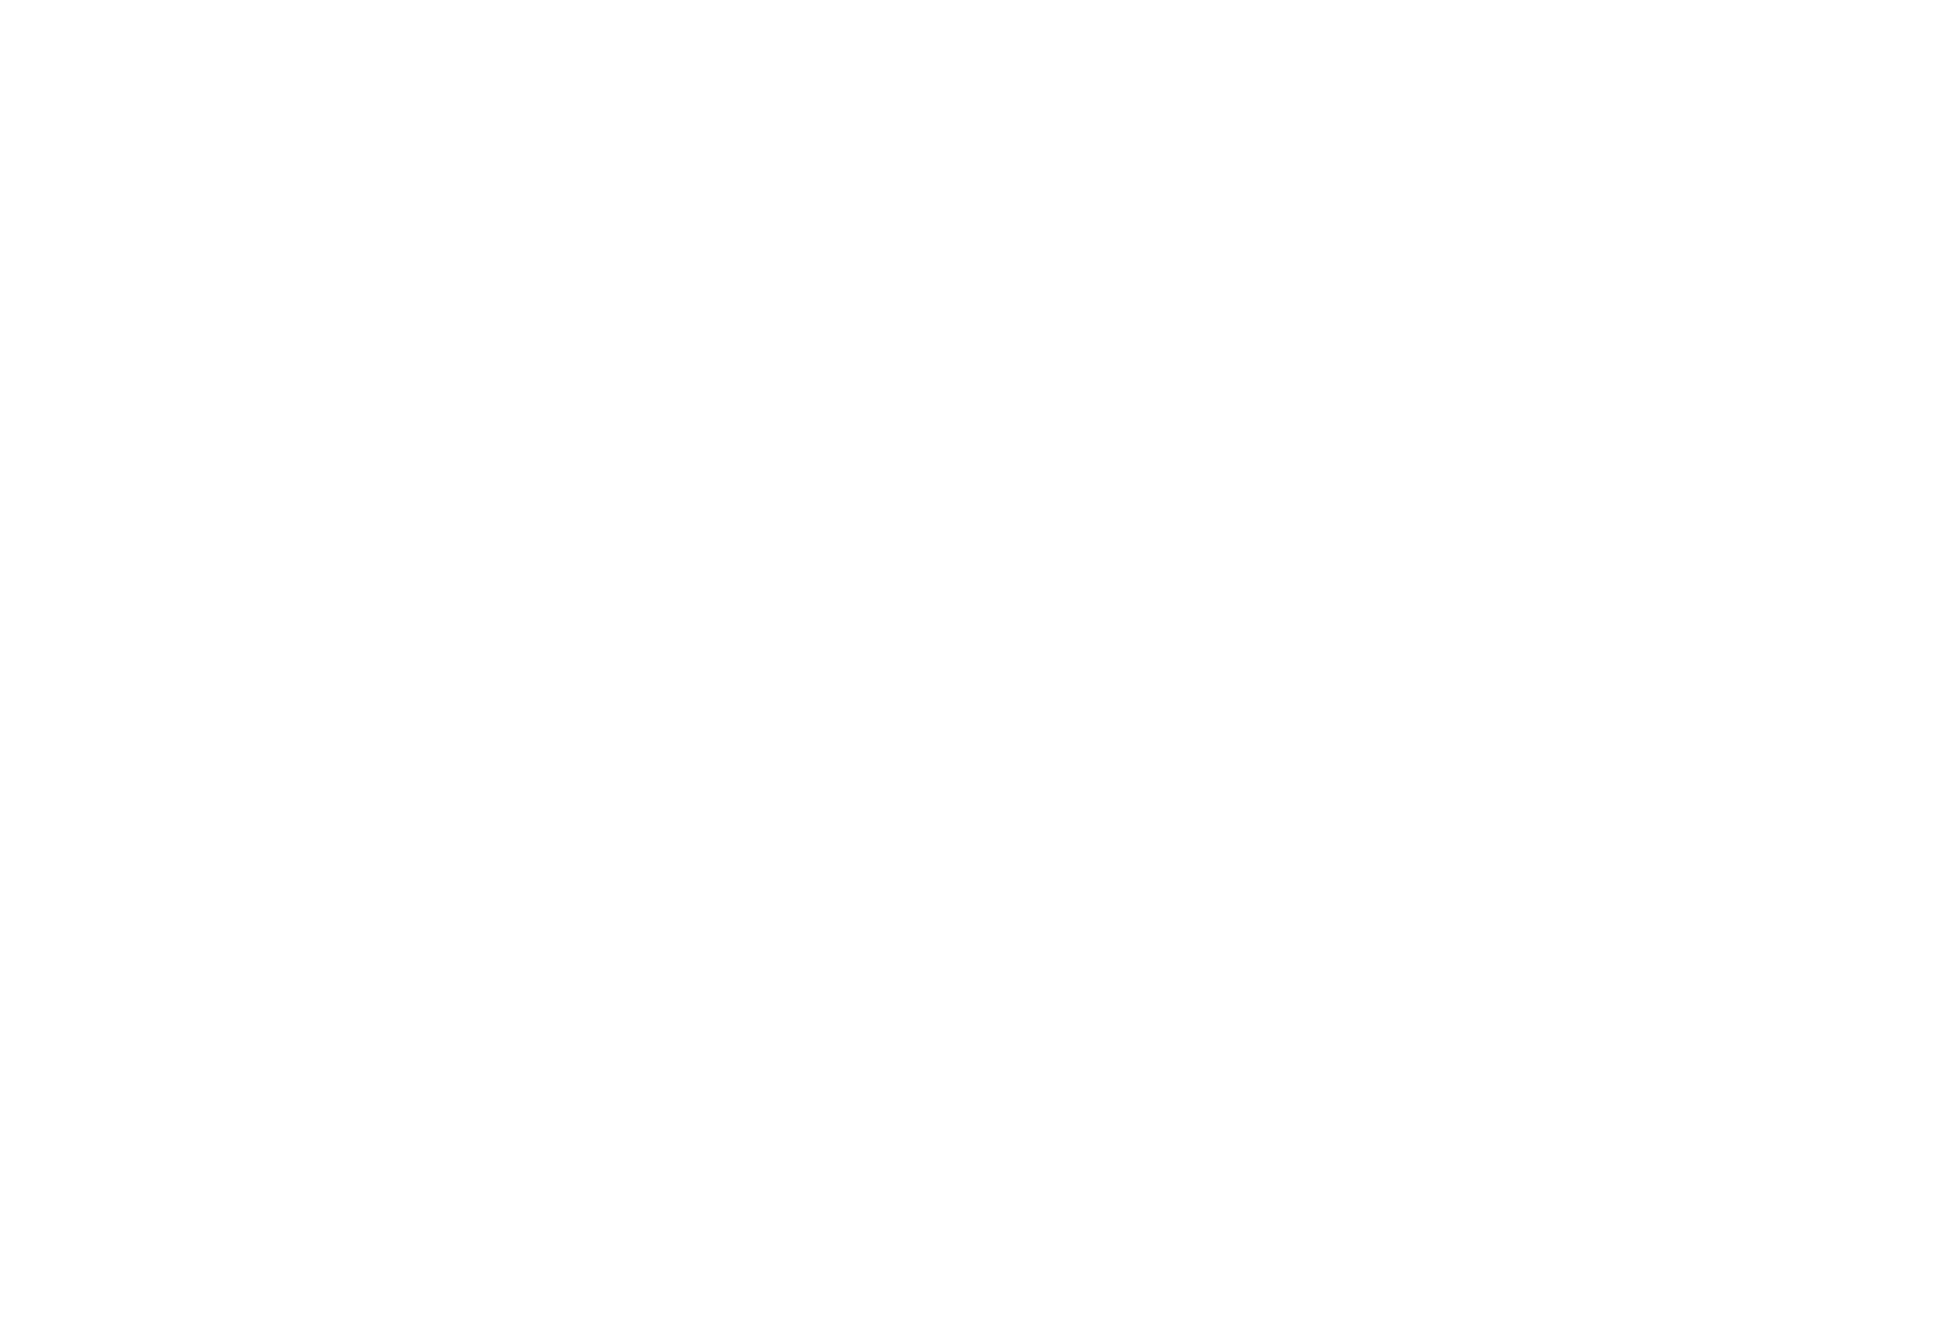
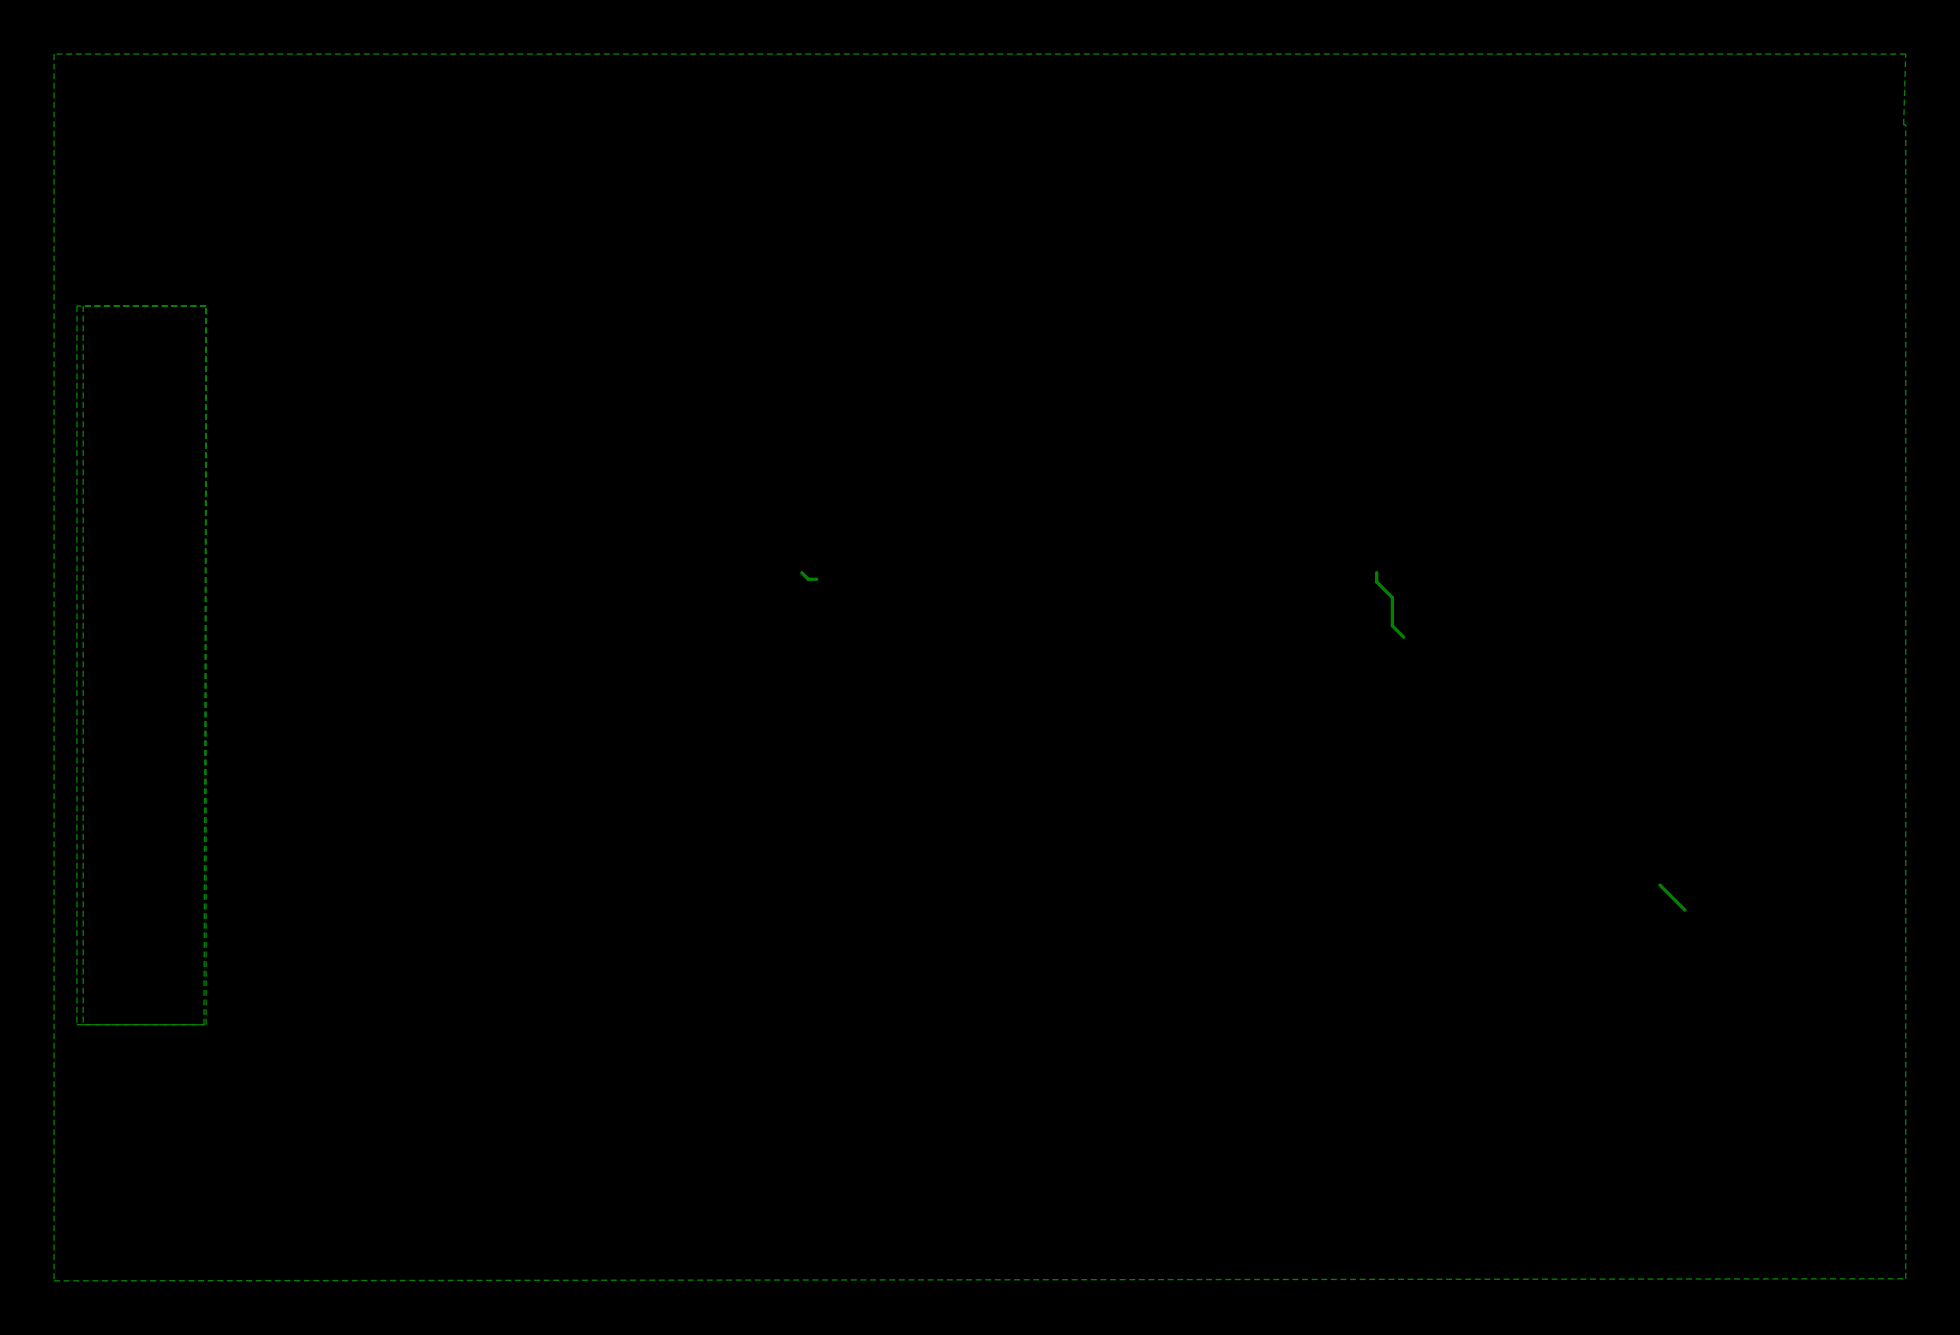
zone outline: none -> (1905, 54) (1903, 124) (1905, 124) (1905, 1278) (54, 1280) (54, 54) (1905, 54)
zone outline: none -> (83, 306) (83, 1024)
zone outline: none -> (206, 306) (204, 1024)
zone outline: none -> (206, 306) (76, 306) (76, 1024) (206, 1024) (206, 306)
track: none -> (801, 572) (808, 579) (816, 579)
track: none -> (1376, 572) (1376, 581) (1392, 597) (1392, 625) (1403, 637)
track: none -> (1659, 885) (1684, 910)

